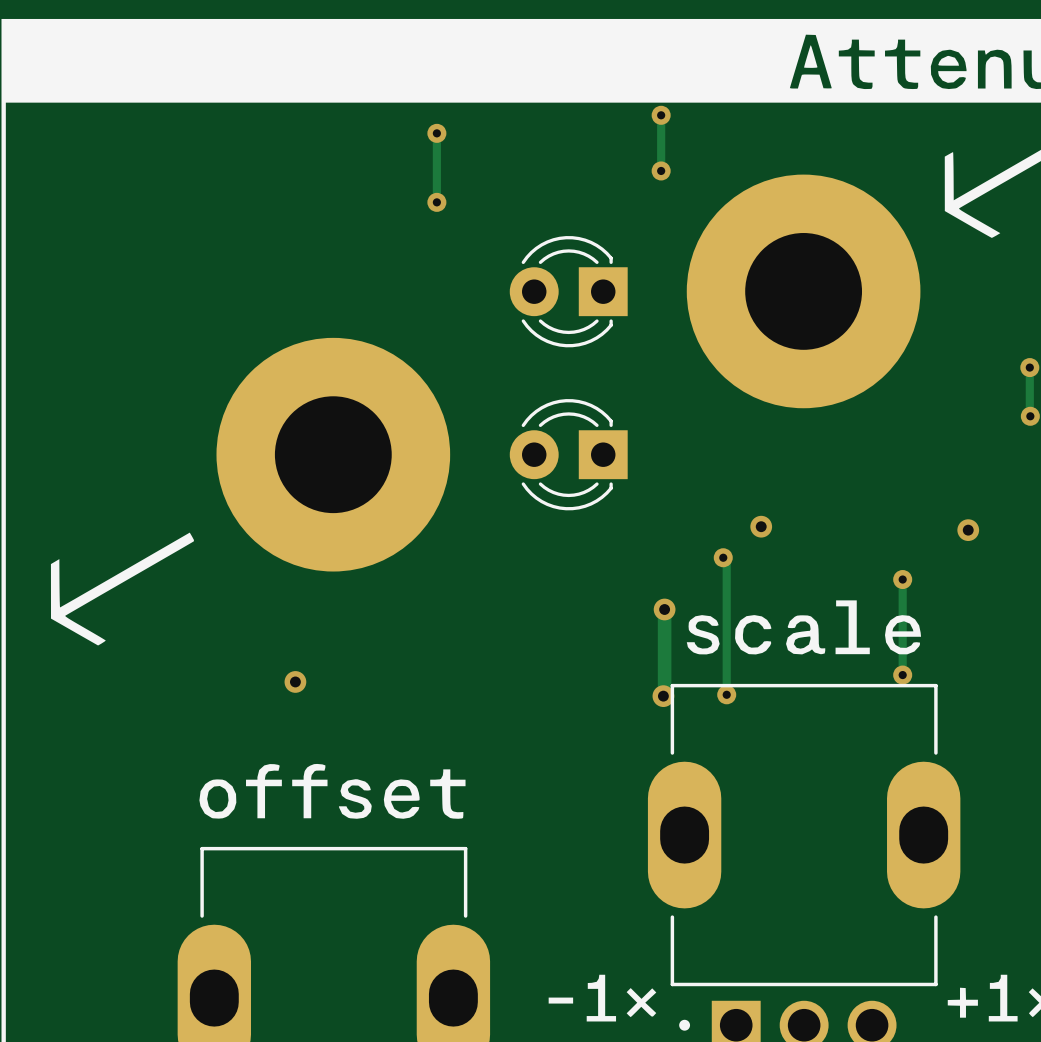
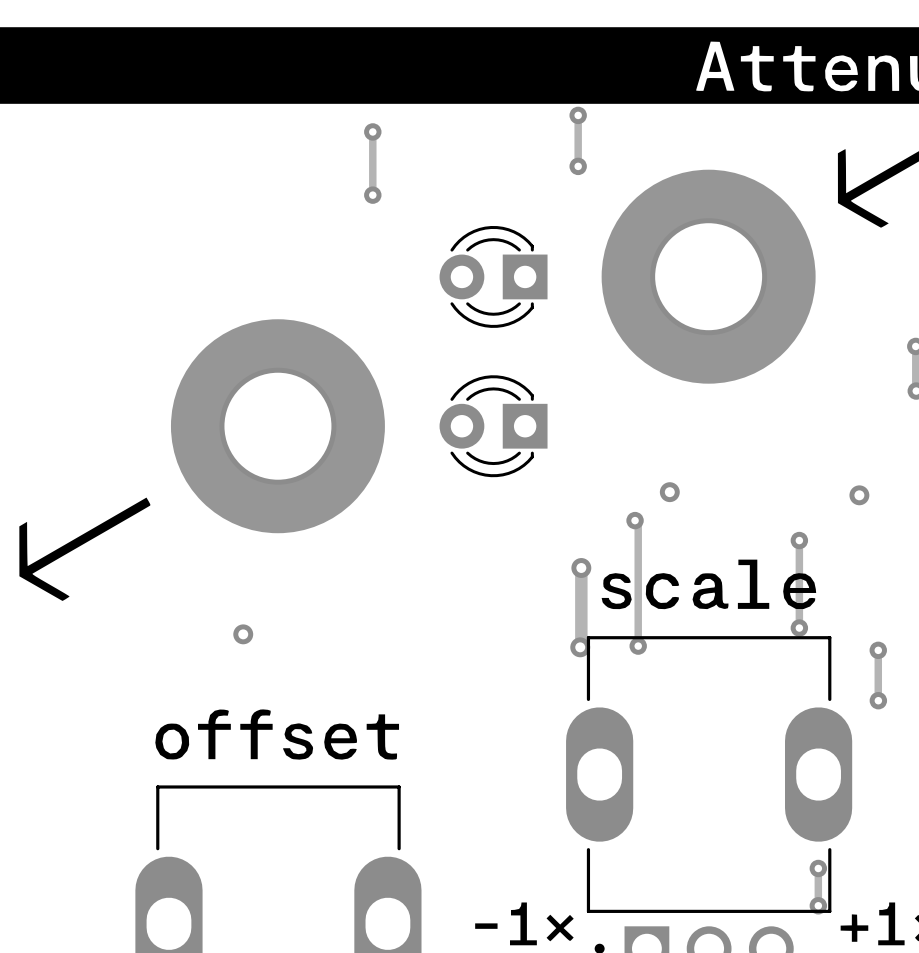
track: none -> (878, 650) (878, 700)
via: none -> (878, 650)
via: none -> (878, 700)
track: none -> (818, 868) (818, 905)
via: none -> (818, 868)
via: none -> (818, 905)

